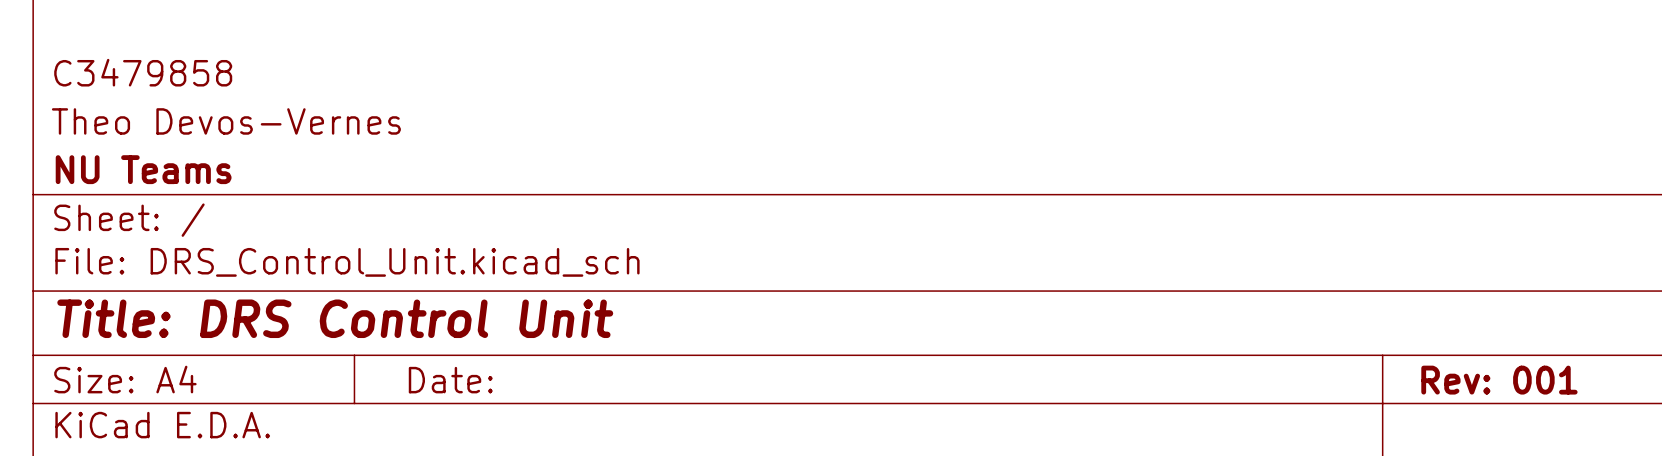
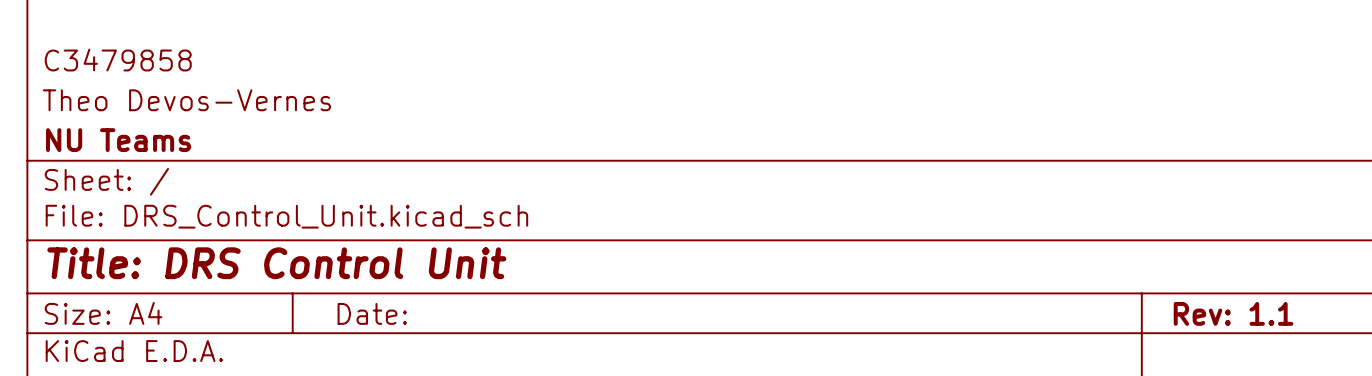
title block: Rev: 001 (1499, 380) -> Rev: 1.1 (1233, 313)

